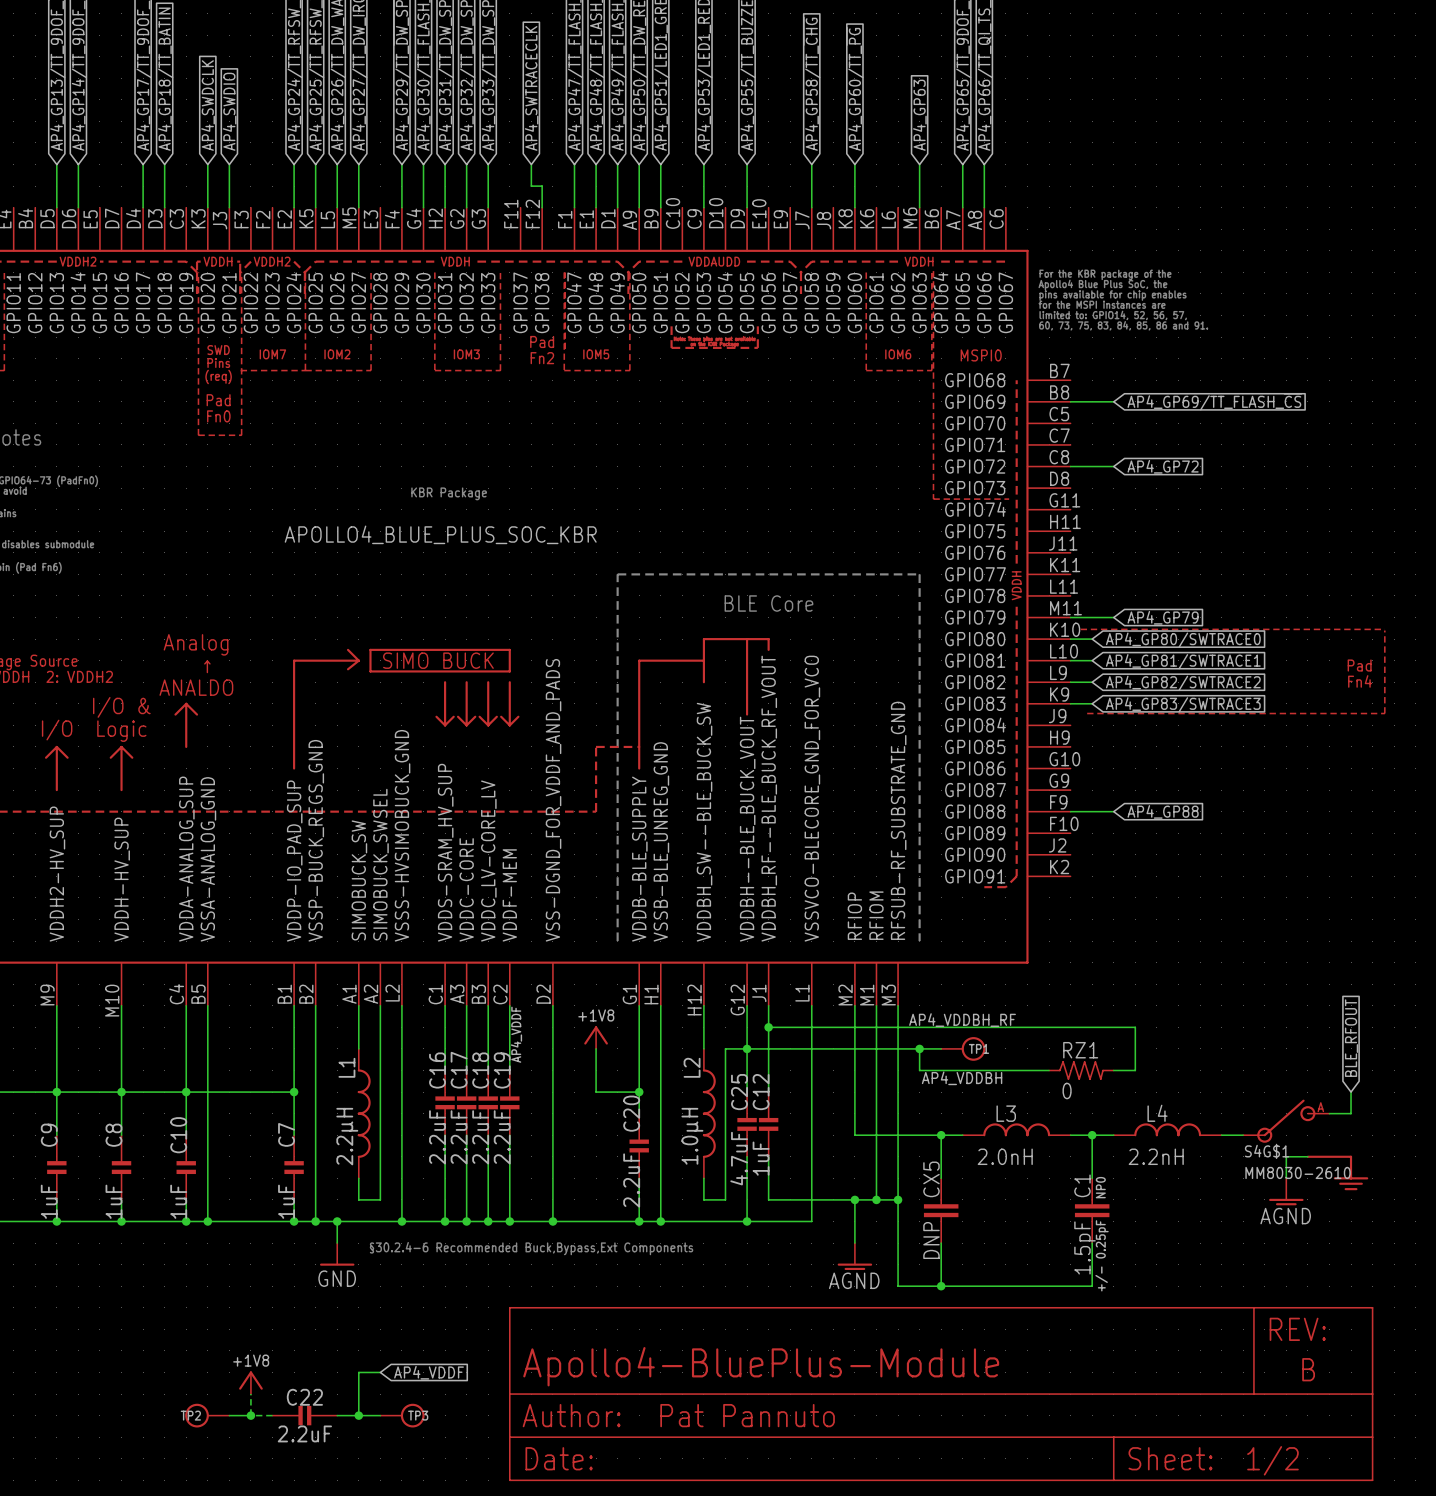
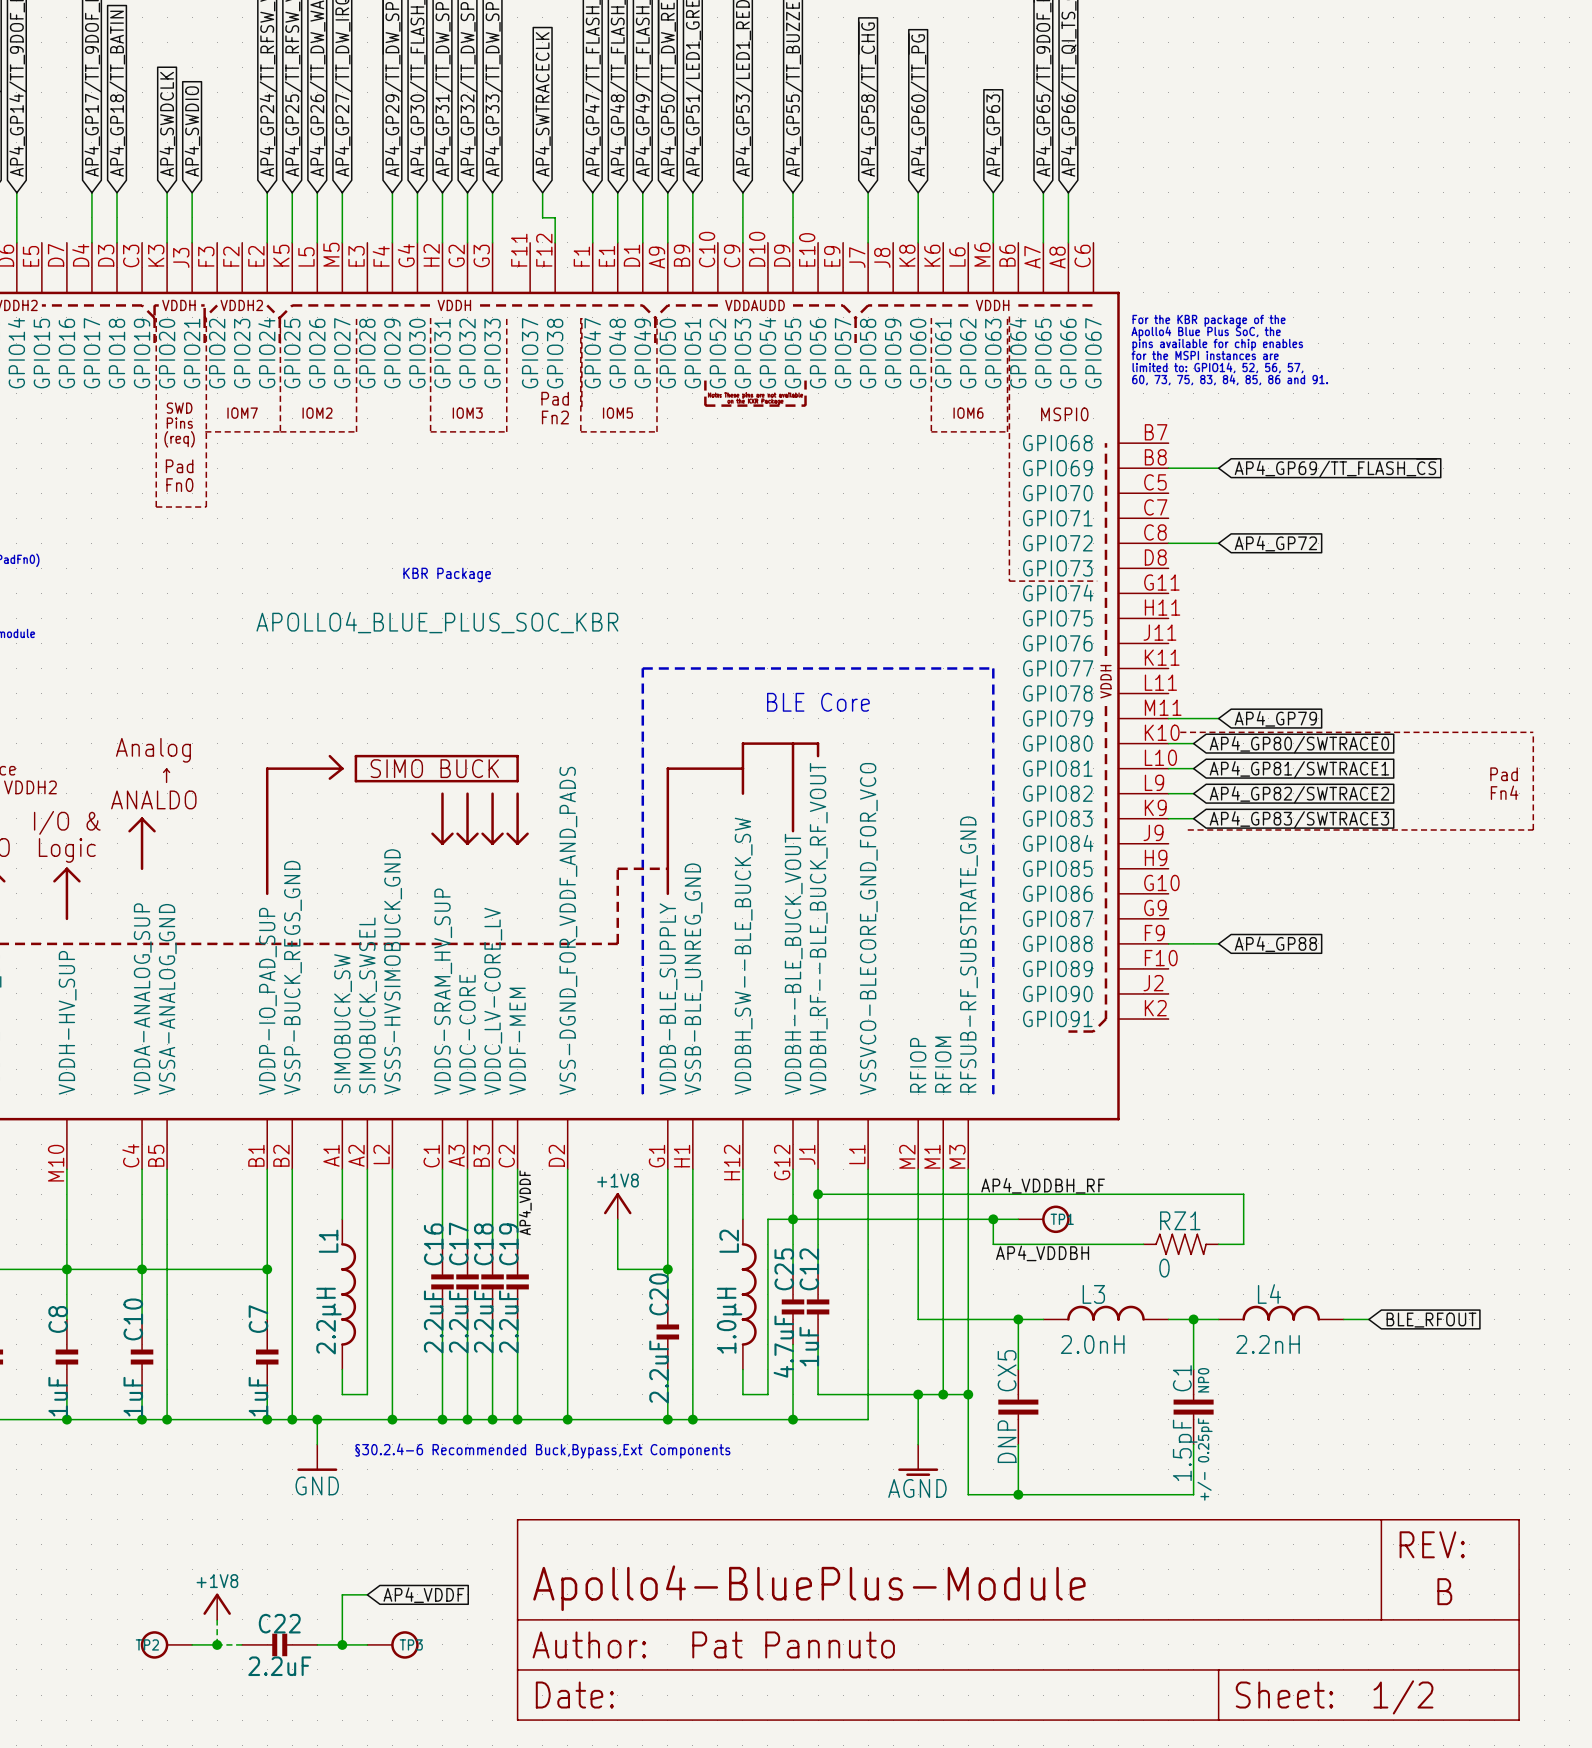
global label rotation: 0° (1351, 1038) -> 90° clockwise (1431, 1320)
wire: (1351, 1092) (1351, 1113) (1329, 1113) -> none
S4G$1: MM8030-2610 (1286, 1121) -> none
wire: (1307, 1156) (1286, 1156) (1286, 1178) -> none
part: (1337, 1172) -> none
power symbol: AGND (1286, 1191) -> none

